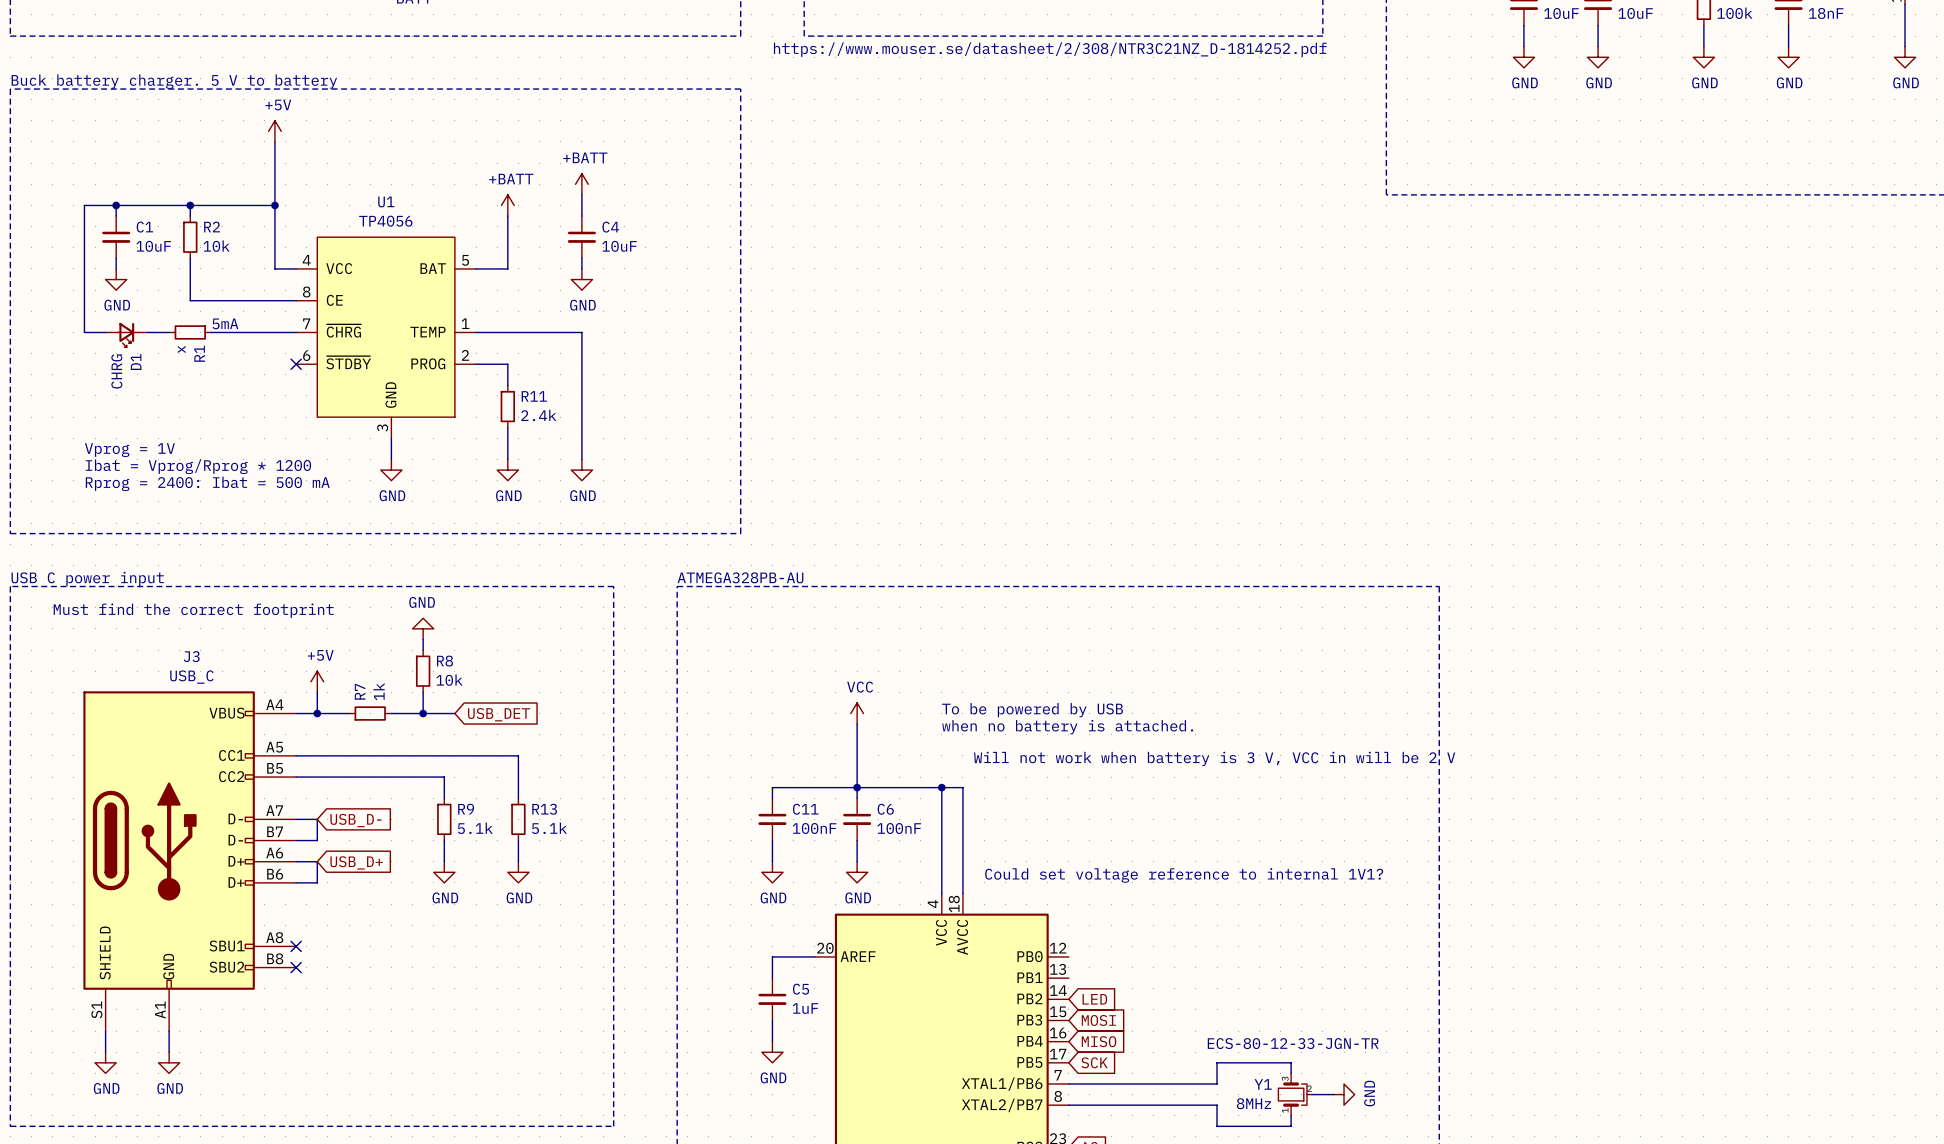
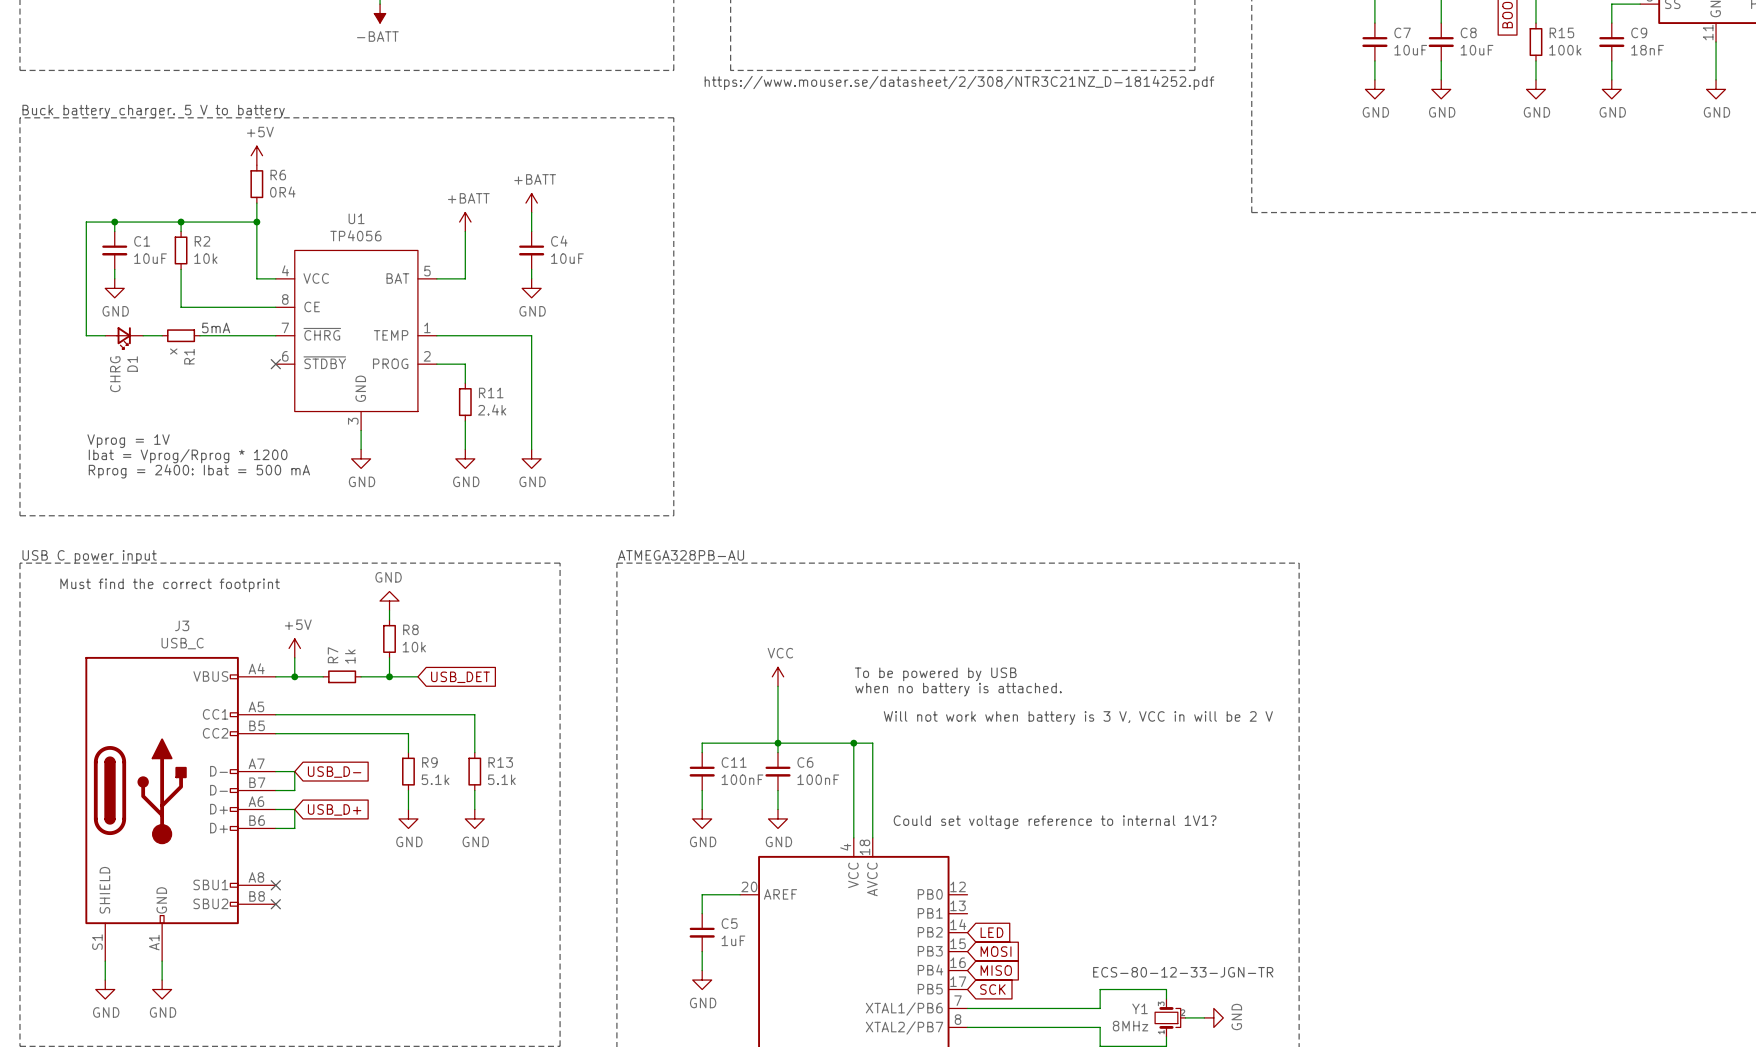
wire: (274, 141) (274, 184) -> none
R6: none -> 0R4 (256, 184)

